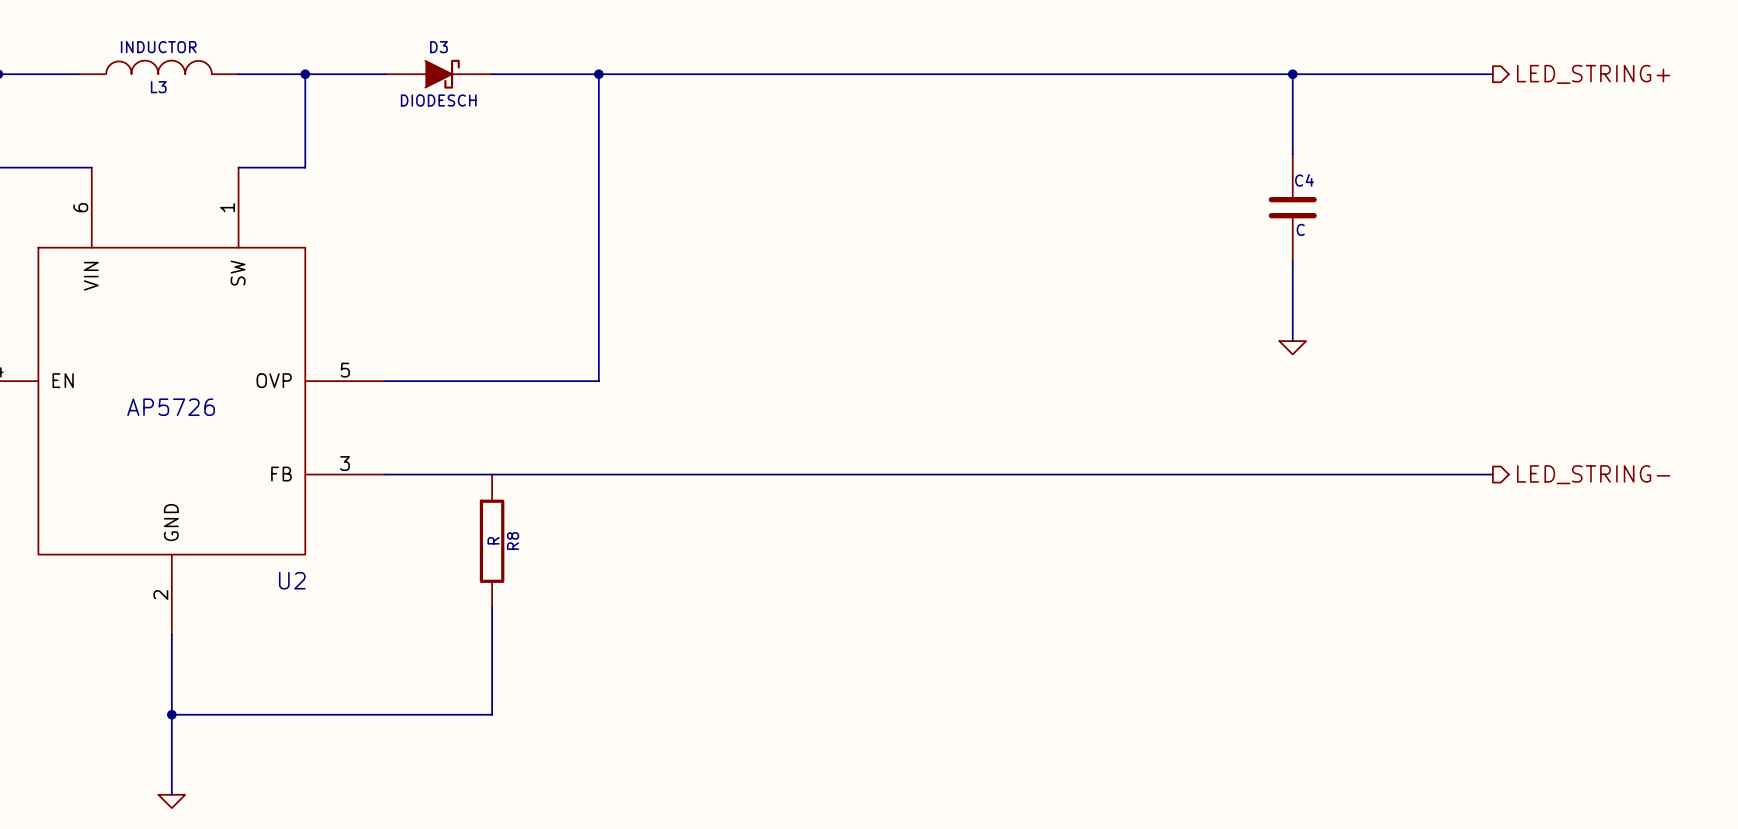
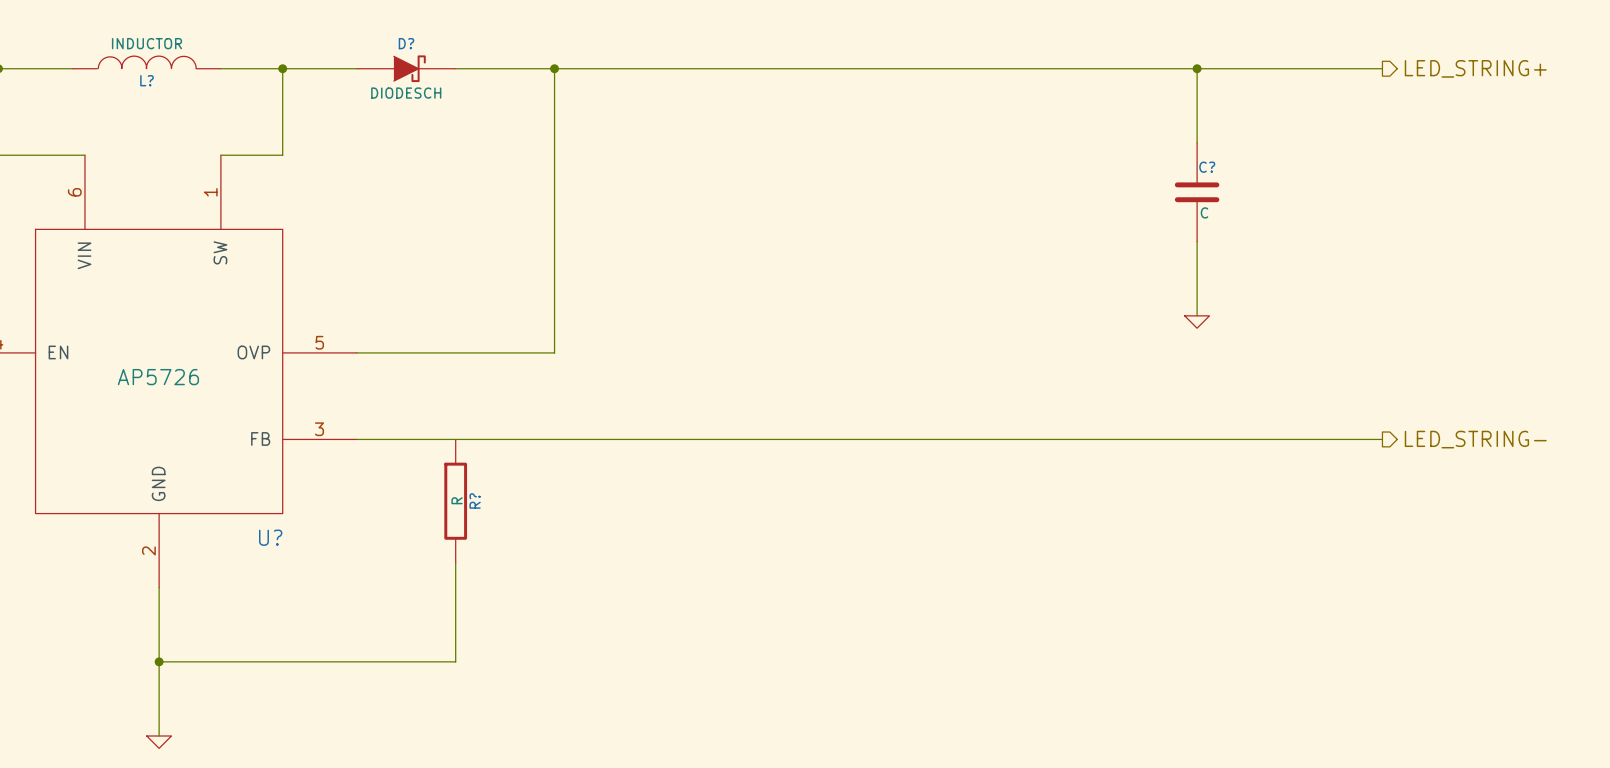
D3 name: D3 (438, 47) -> D? (406, 43)
L3 name: L3 (158, 87) -> L? (147, 80)
C4 name: C4 (1304, 180) -> C? (1207, 167)
R8 name: R8 (513, 541) -> R? (475, 500)
U2 name: U2 (292, 580) -> U? (270, 537)

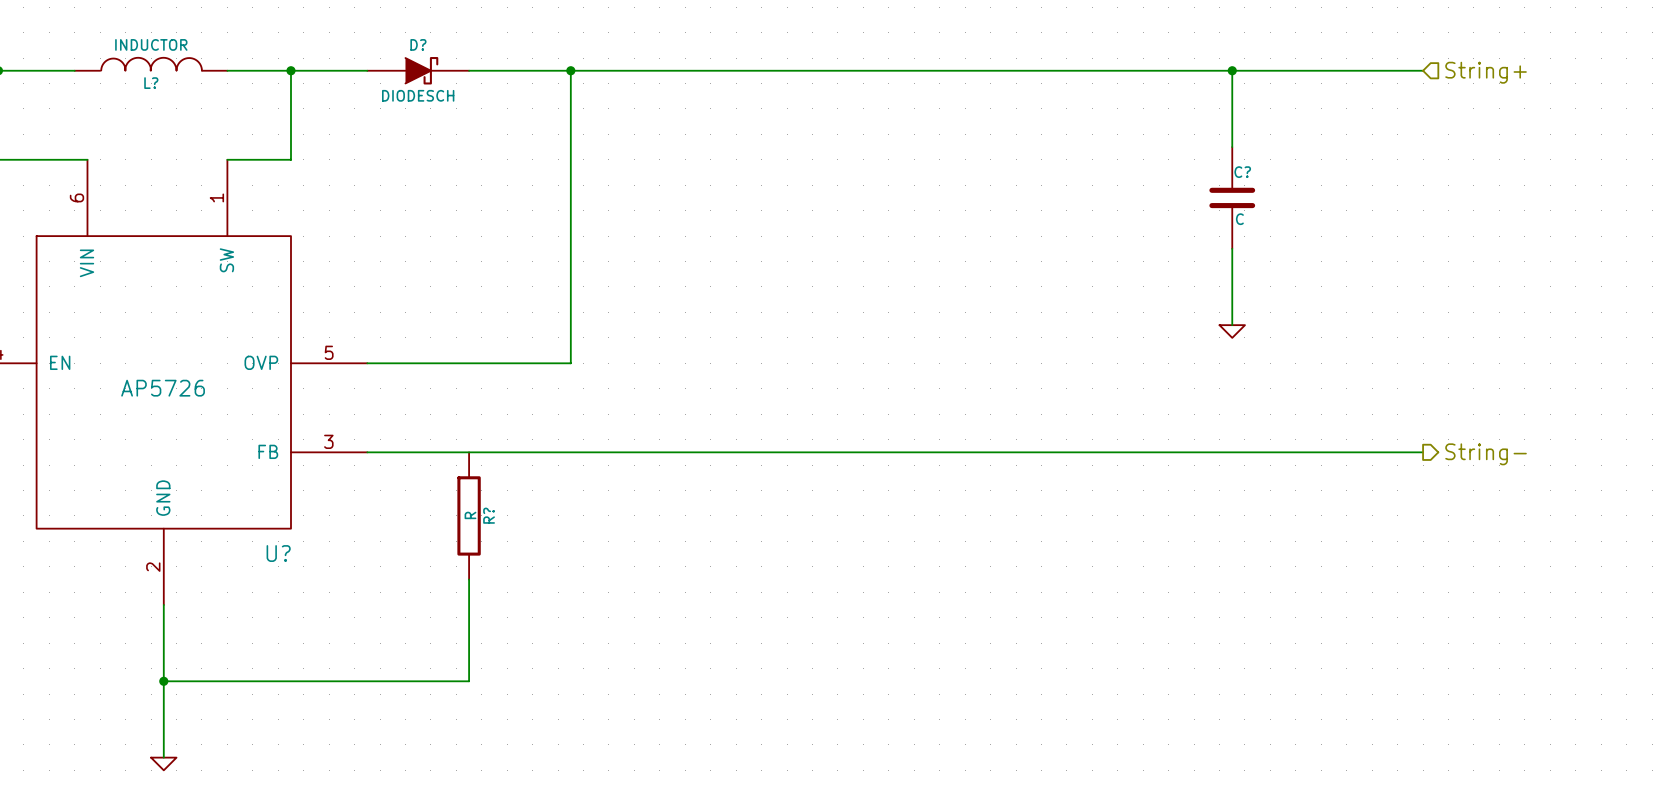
hierarchical label shape: output (1475, 68) -> input (1486, 72)
hierarchical label: LED_STRING+ (1475, 68) -> String+ (1486, 72)
hierarchical label: LED_STRING- (1475, 439) -> String- (1486, 454)

